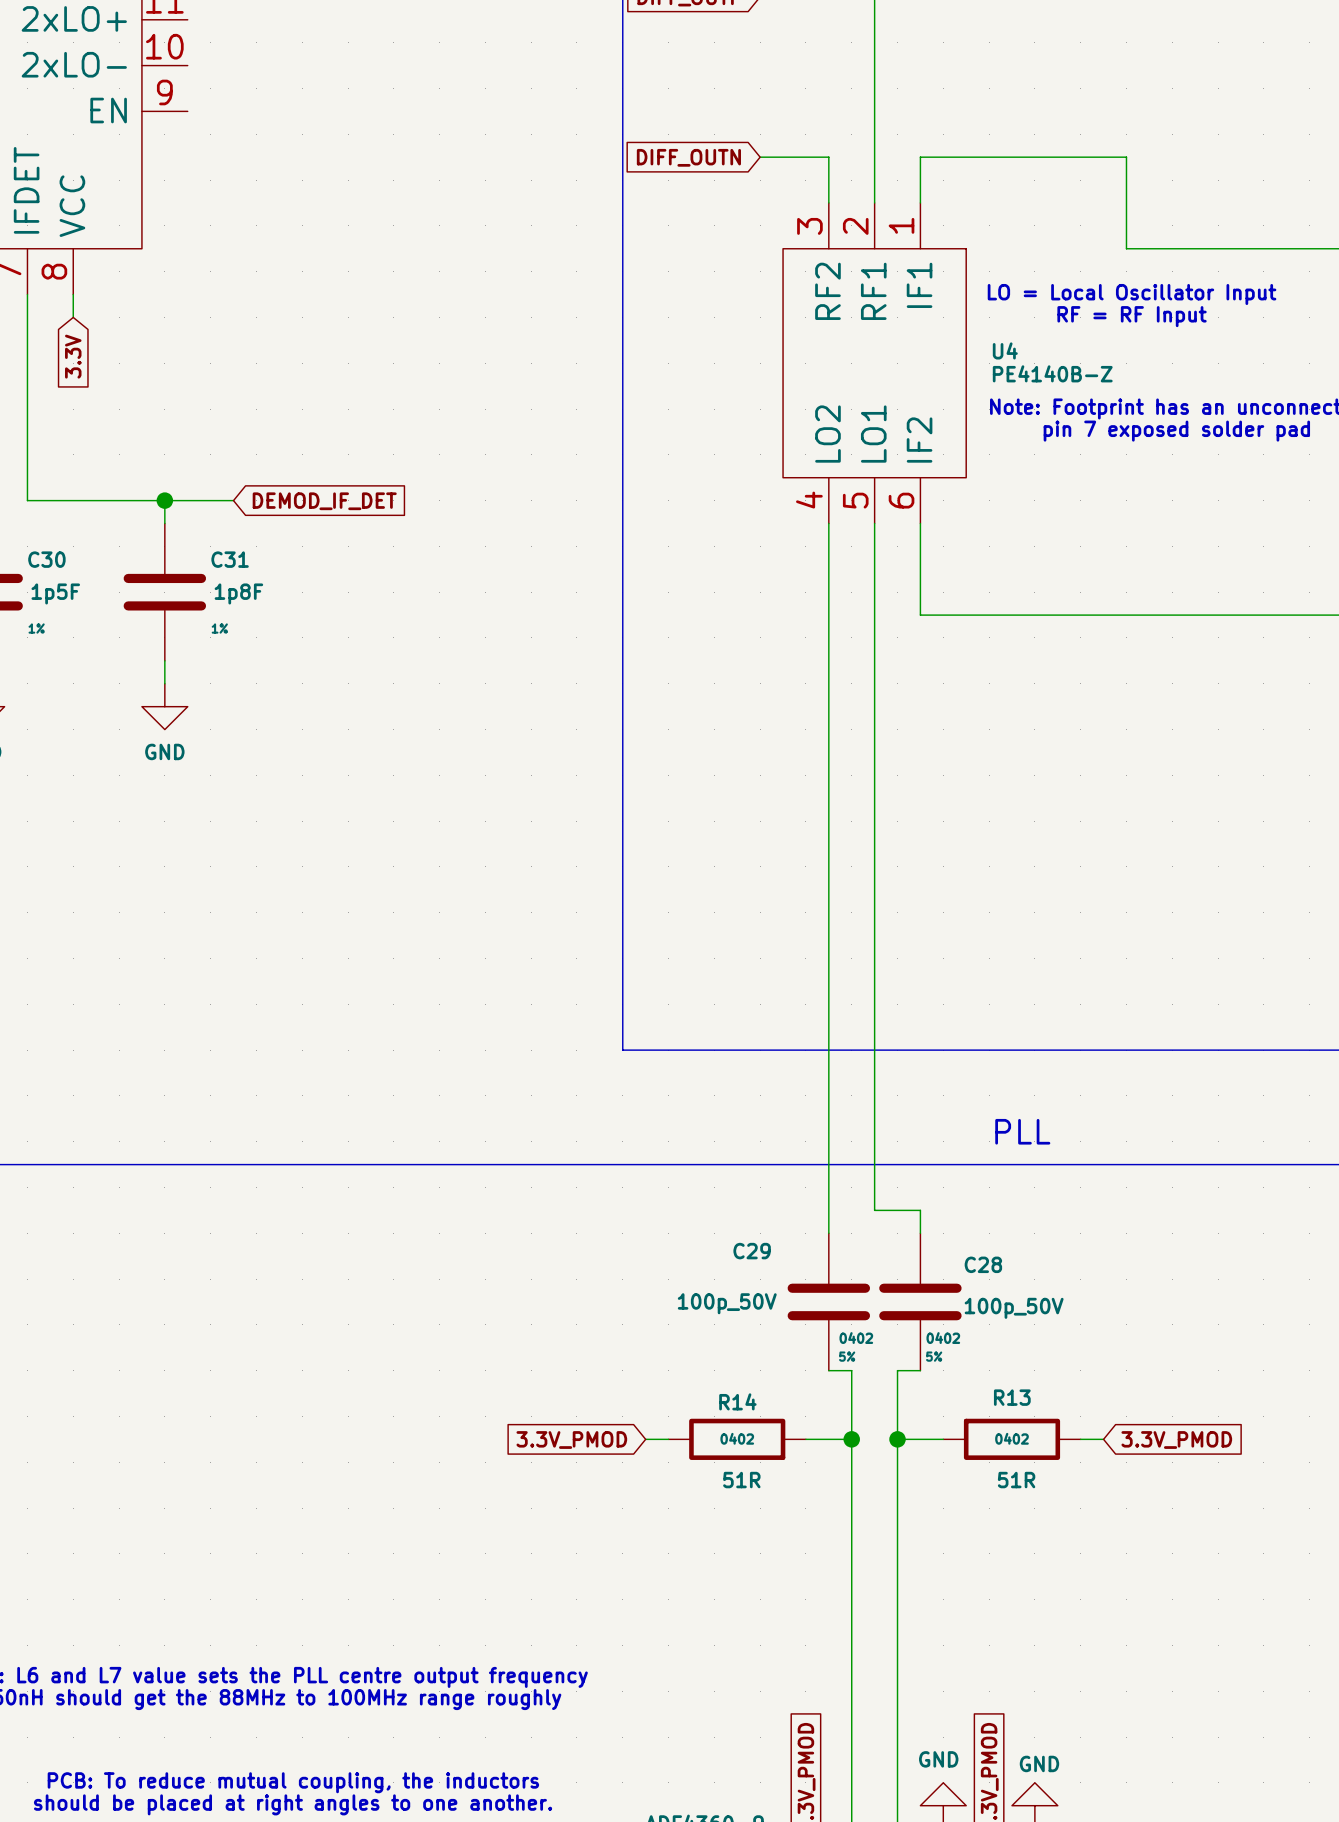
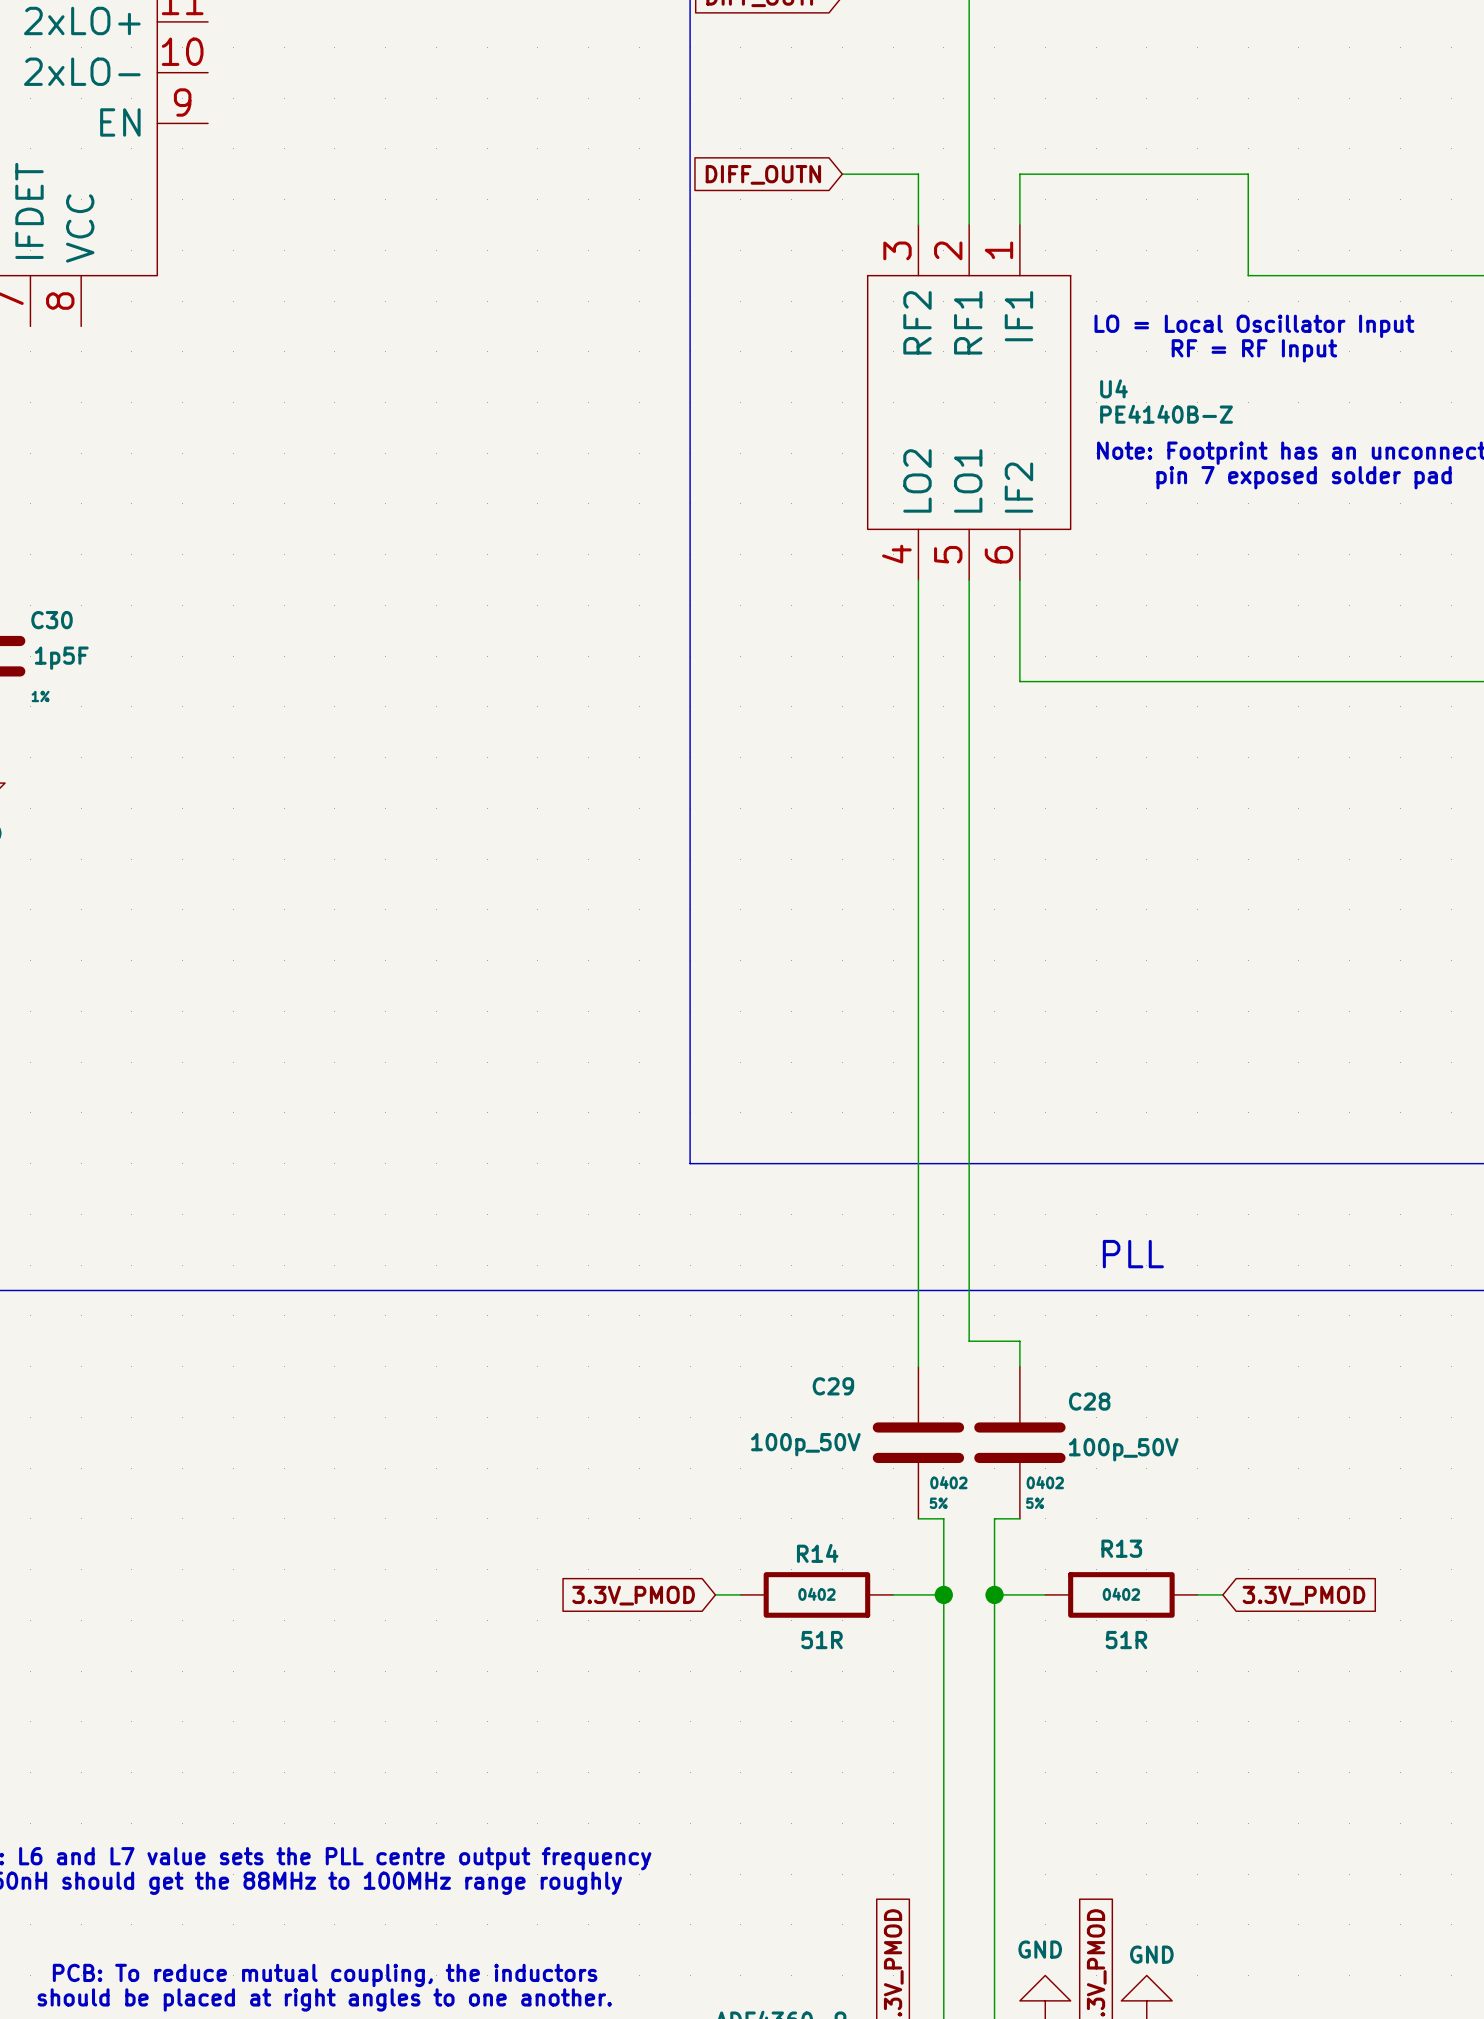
wire: (27, 294) (27, 500) (233, 500) -> none
wire: (73, 294) (73, 317) -> none
global label: 3.3V (73, 356) -> none
wire: (164, 500) (164, 523) -> none
junction: (164, 500) -> none
global label: DEMOD_IF_DET (324, 501) -> none
C31: 1p8F (164, 592) -> none
wire: (164, 660) (164, 683) -> none
power symbol: GND (164, 706) -> none

